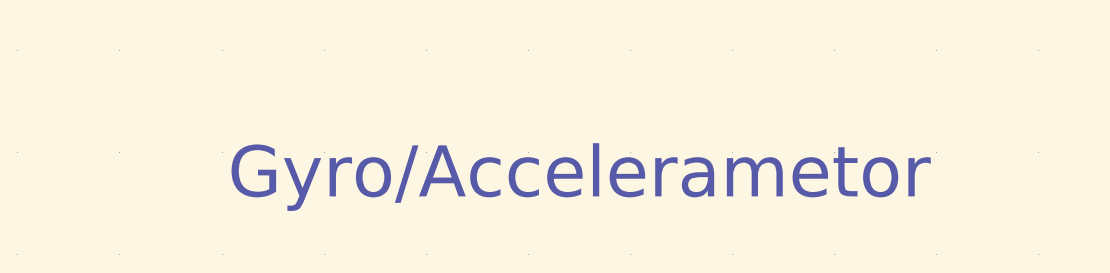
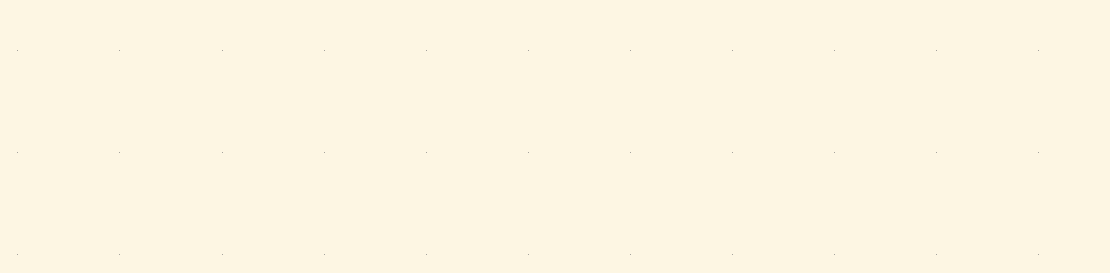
text: Gyro/Accelerametor (581, 177) -> none

